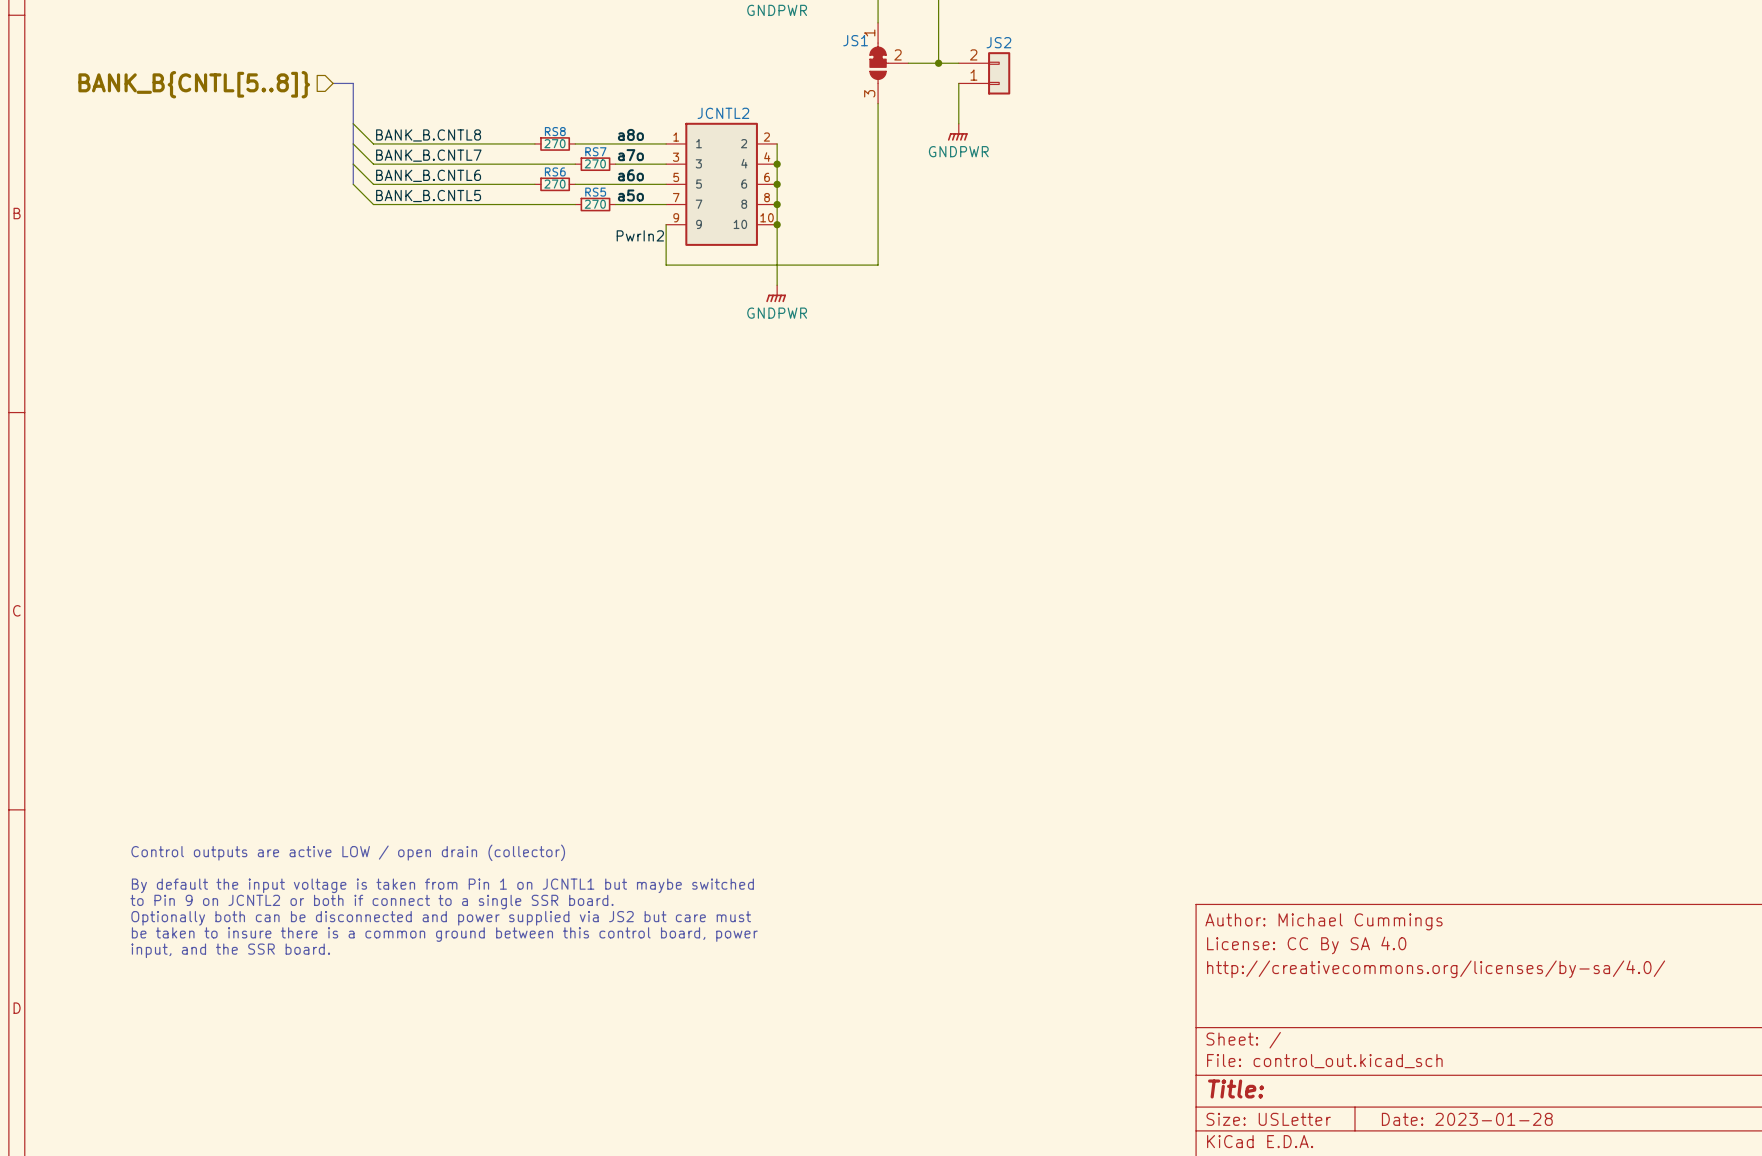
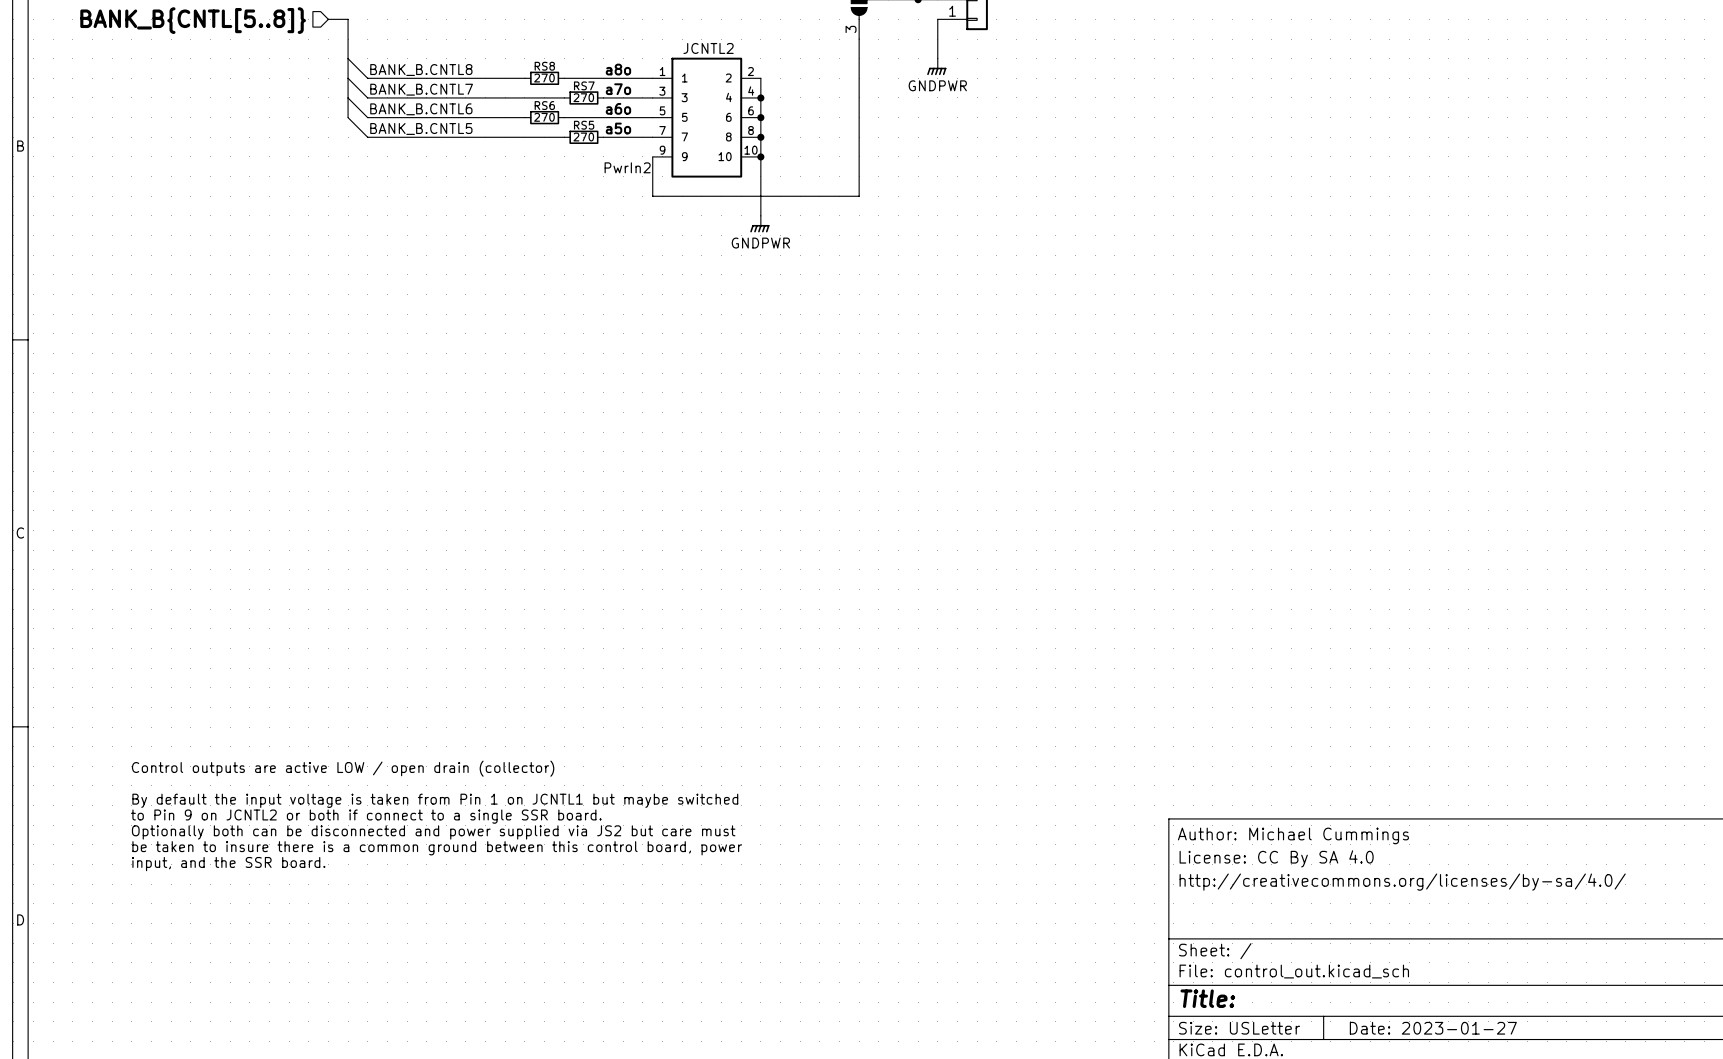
title block: Date: 2023-01-28 (1467, 1119) -> Date: 2023-01-27 (1433, 1028)

